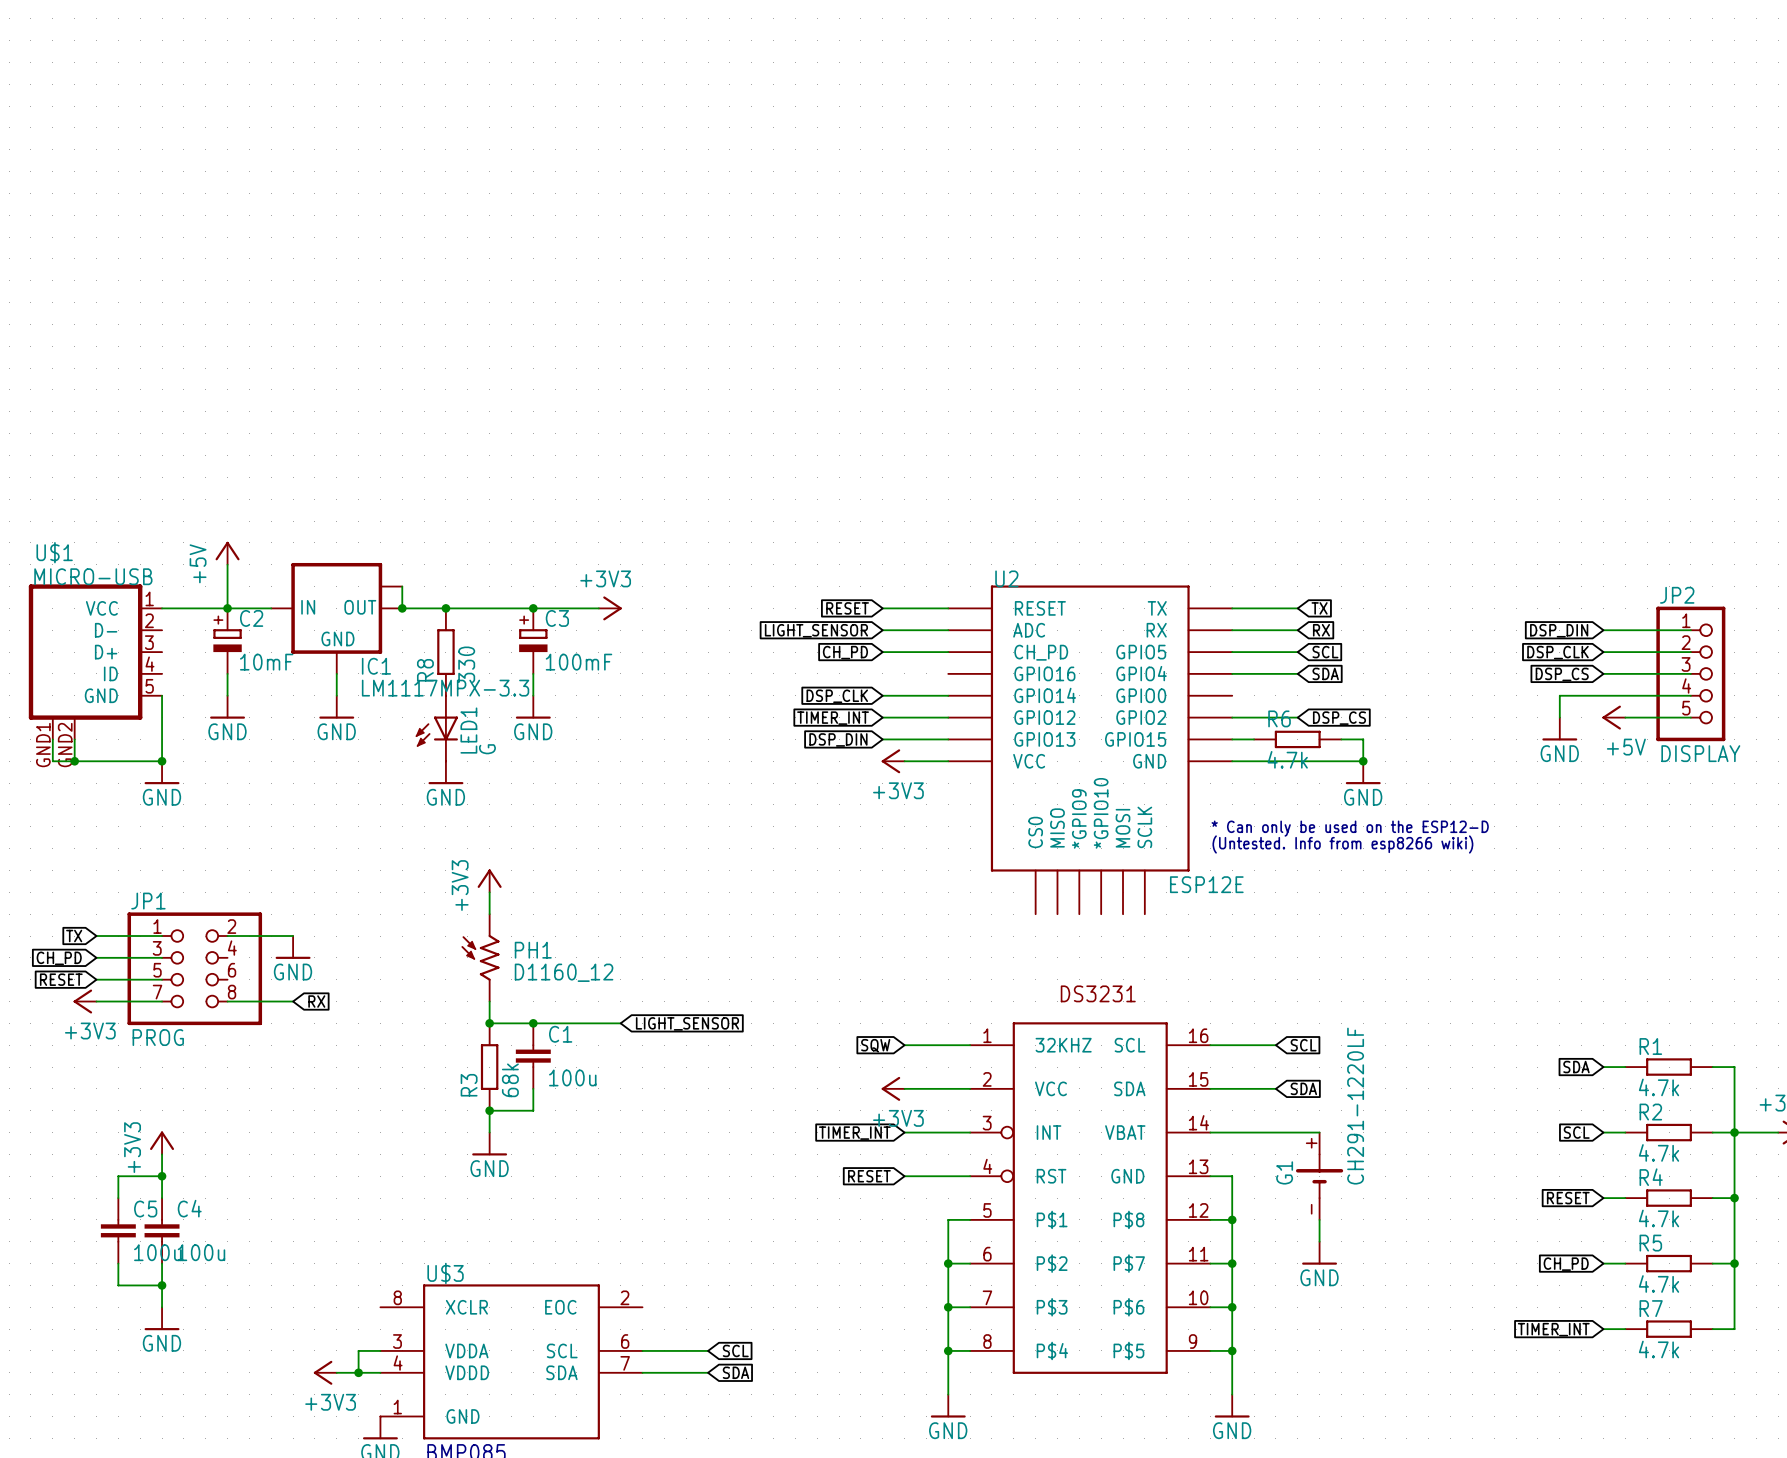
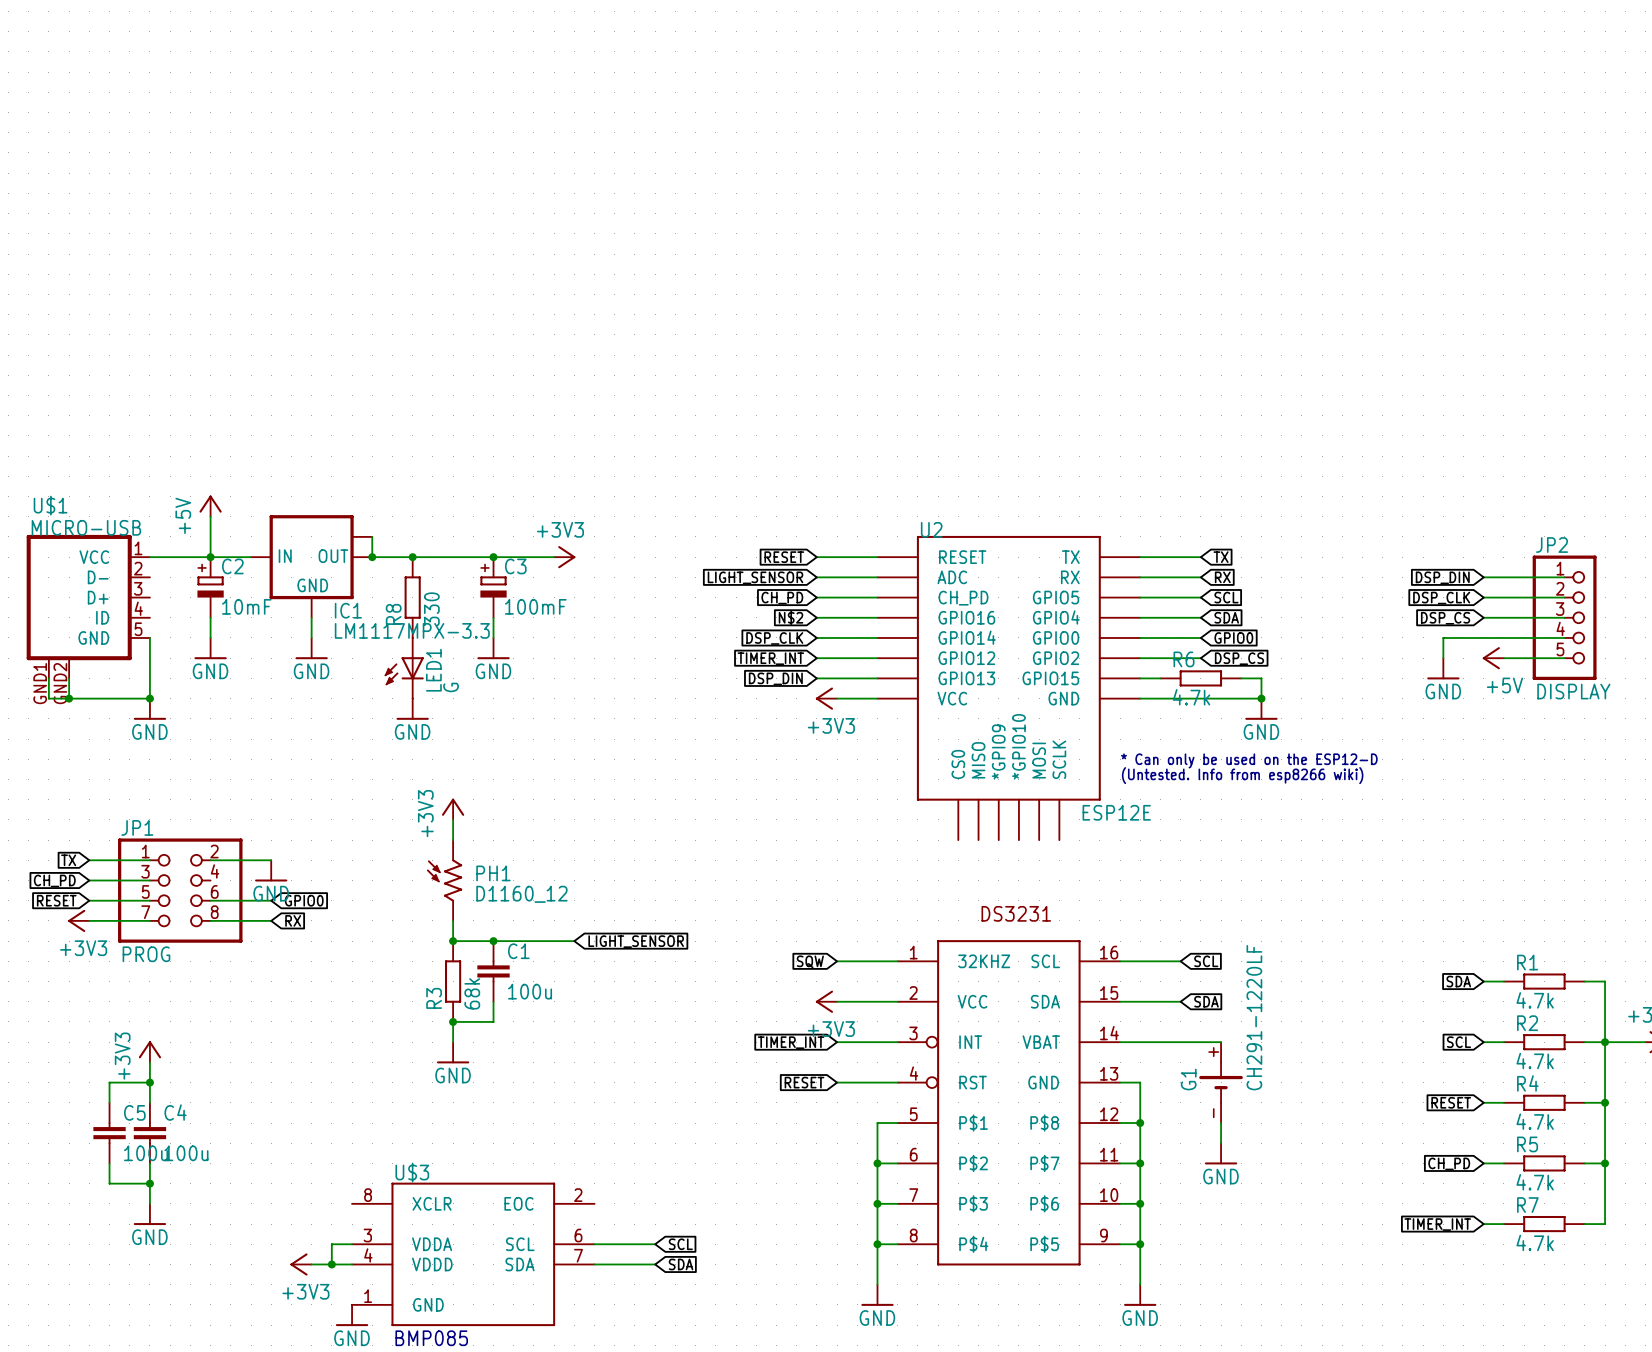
global label: none -> N$2 (790, 617)
wire: none -> (816, 617) (877, 617)
wire: none -> (1140, 637) (1200, 637)
global label: none -> GPIO0 (1233, 637)
wire: none -> (210, 900) (271, 900)
global label: none -> GPIO0 (304, 900)

